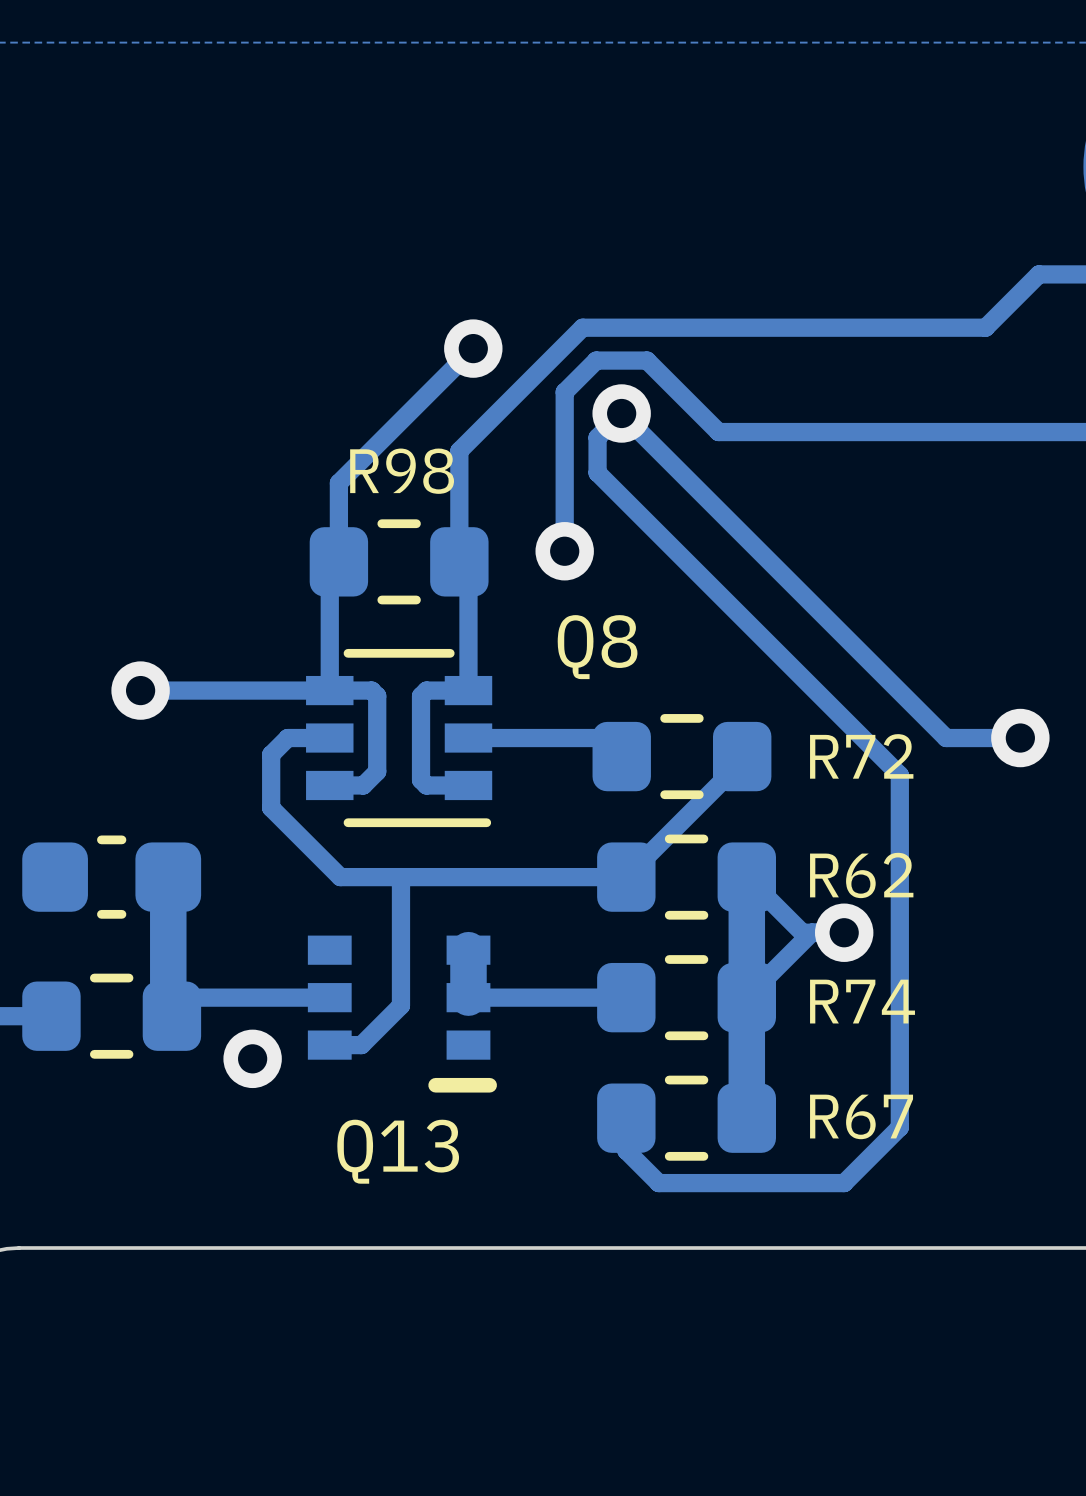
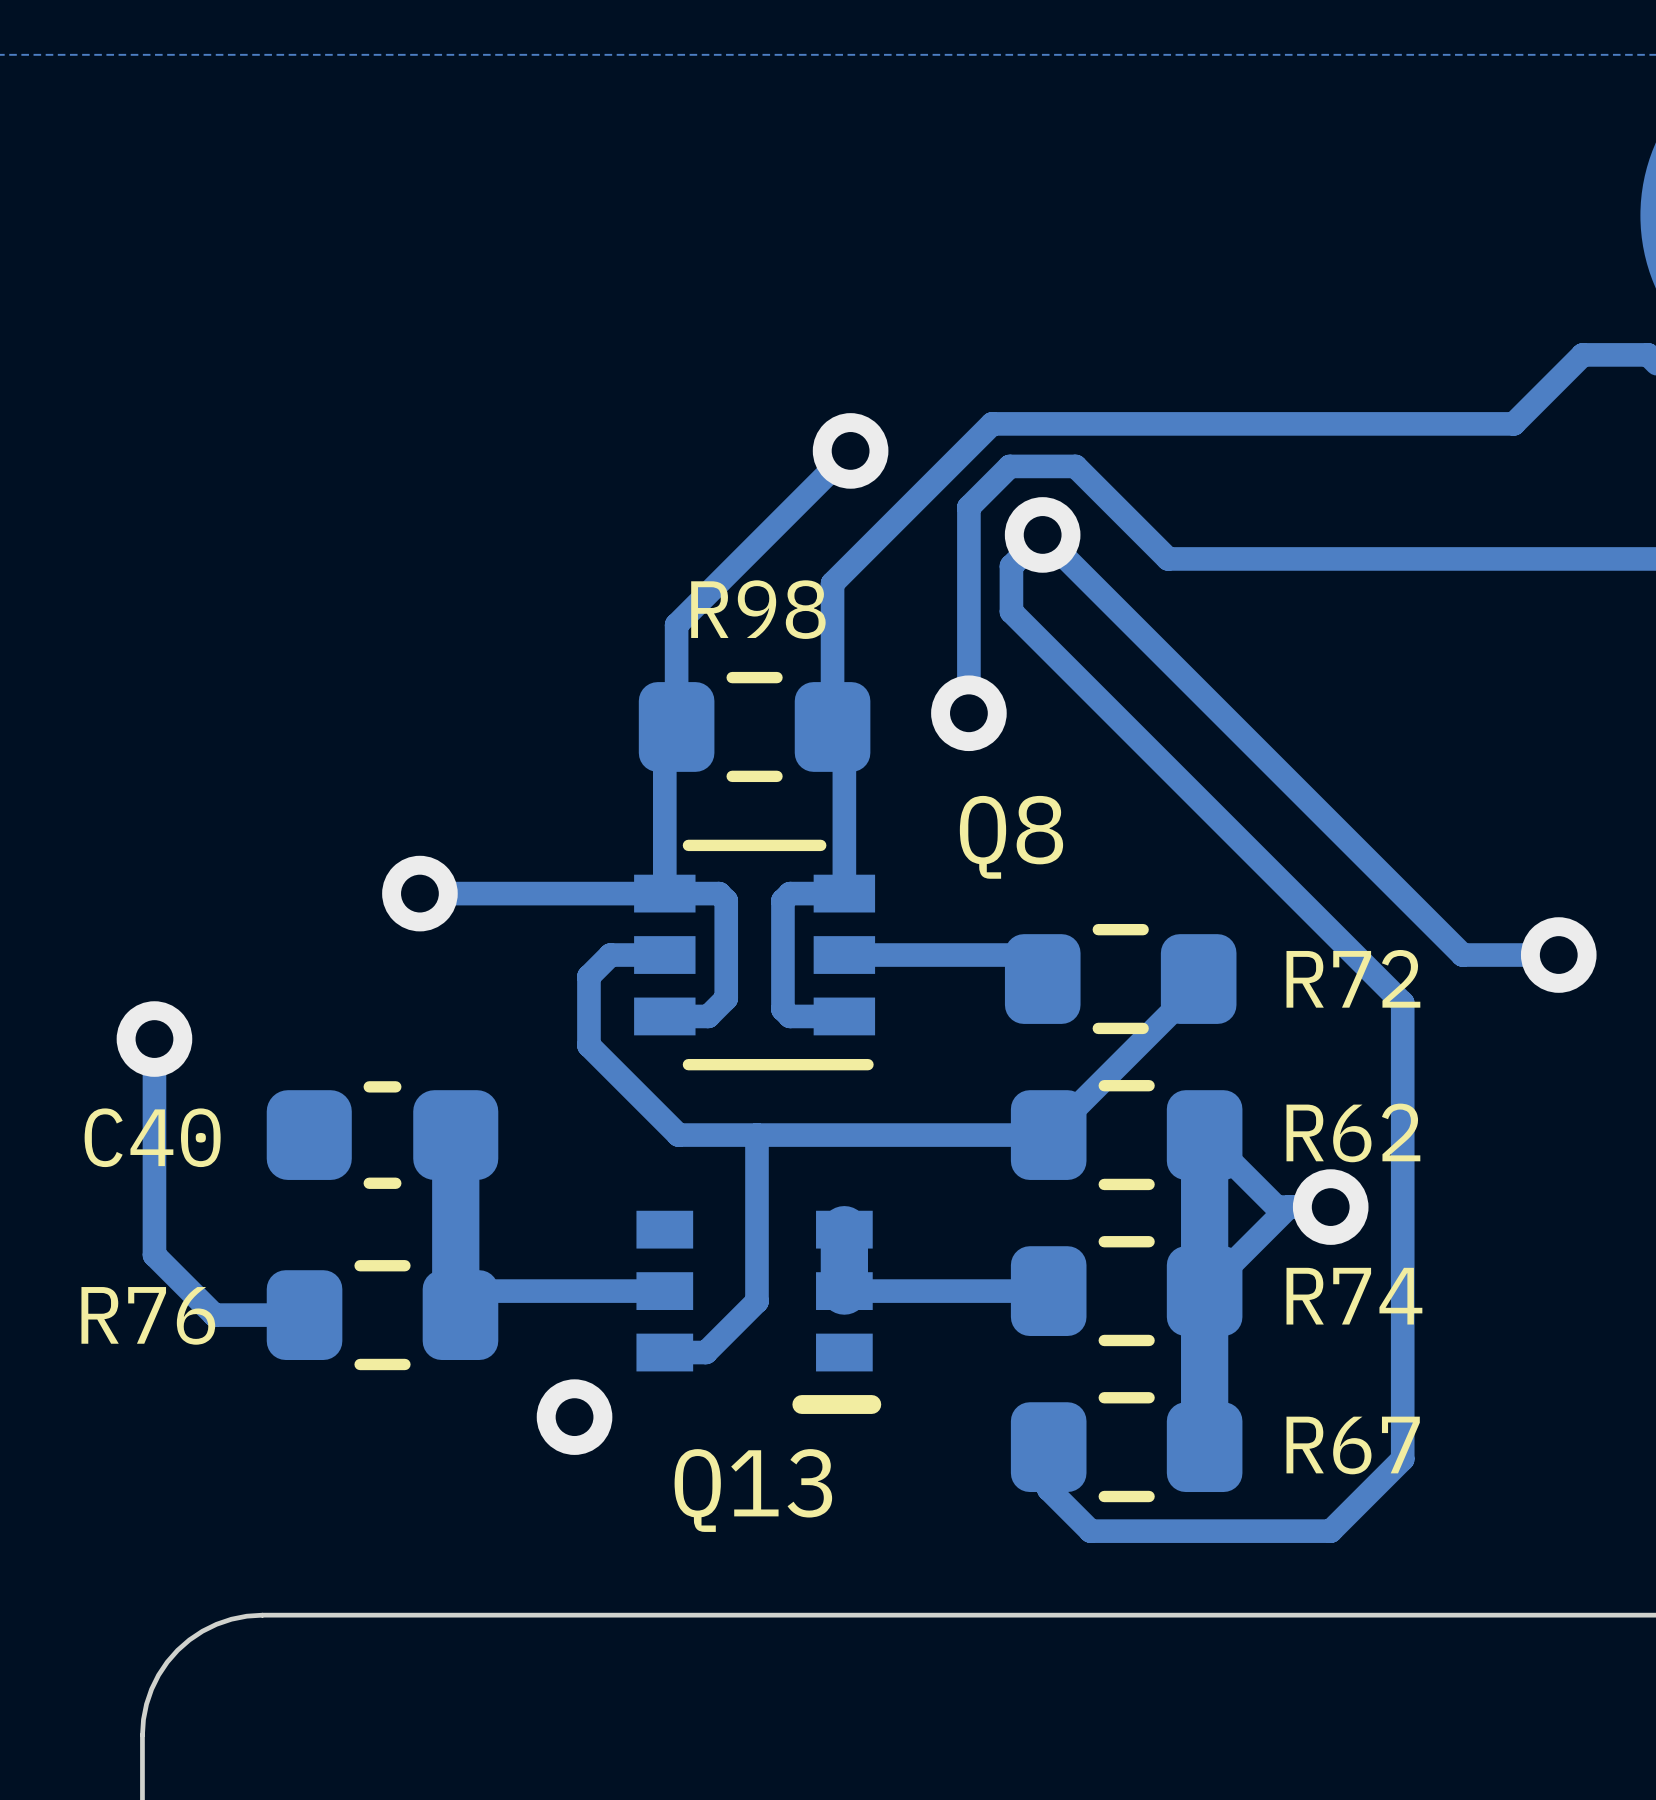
via position: (252, 1058) -> (574, 1417)

